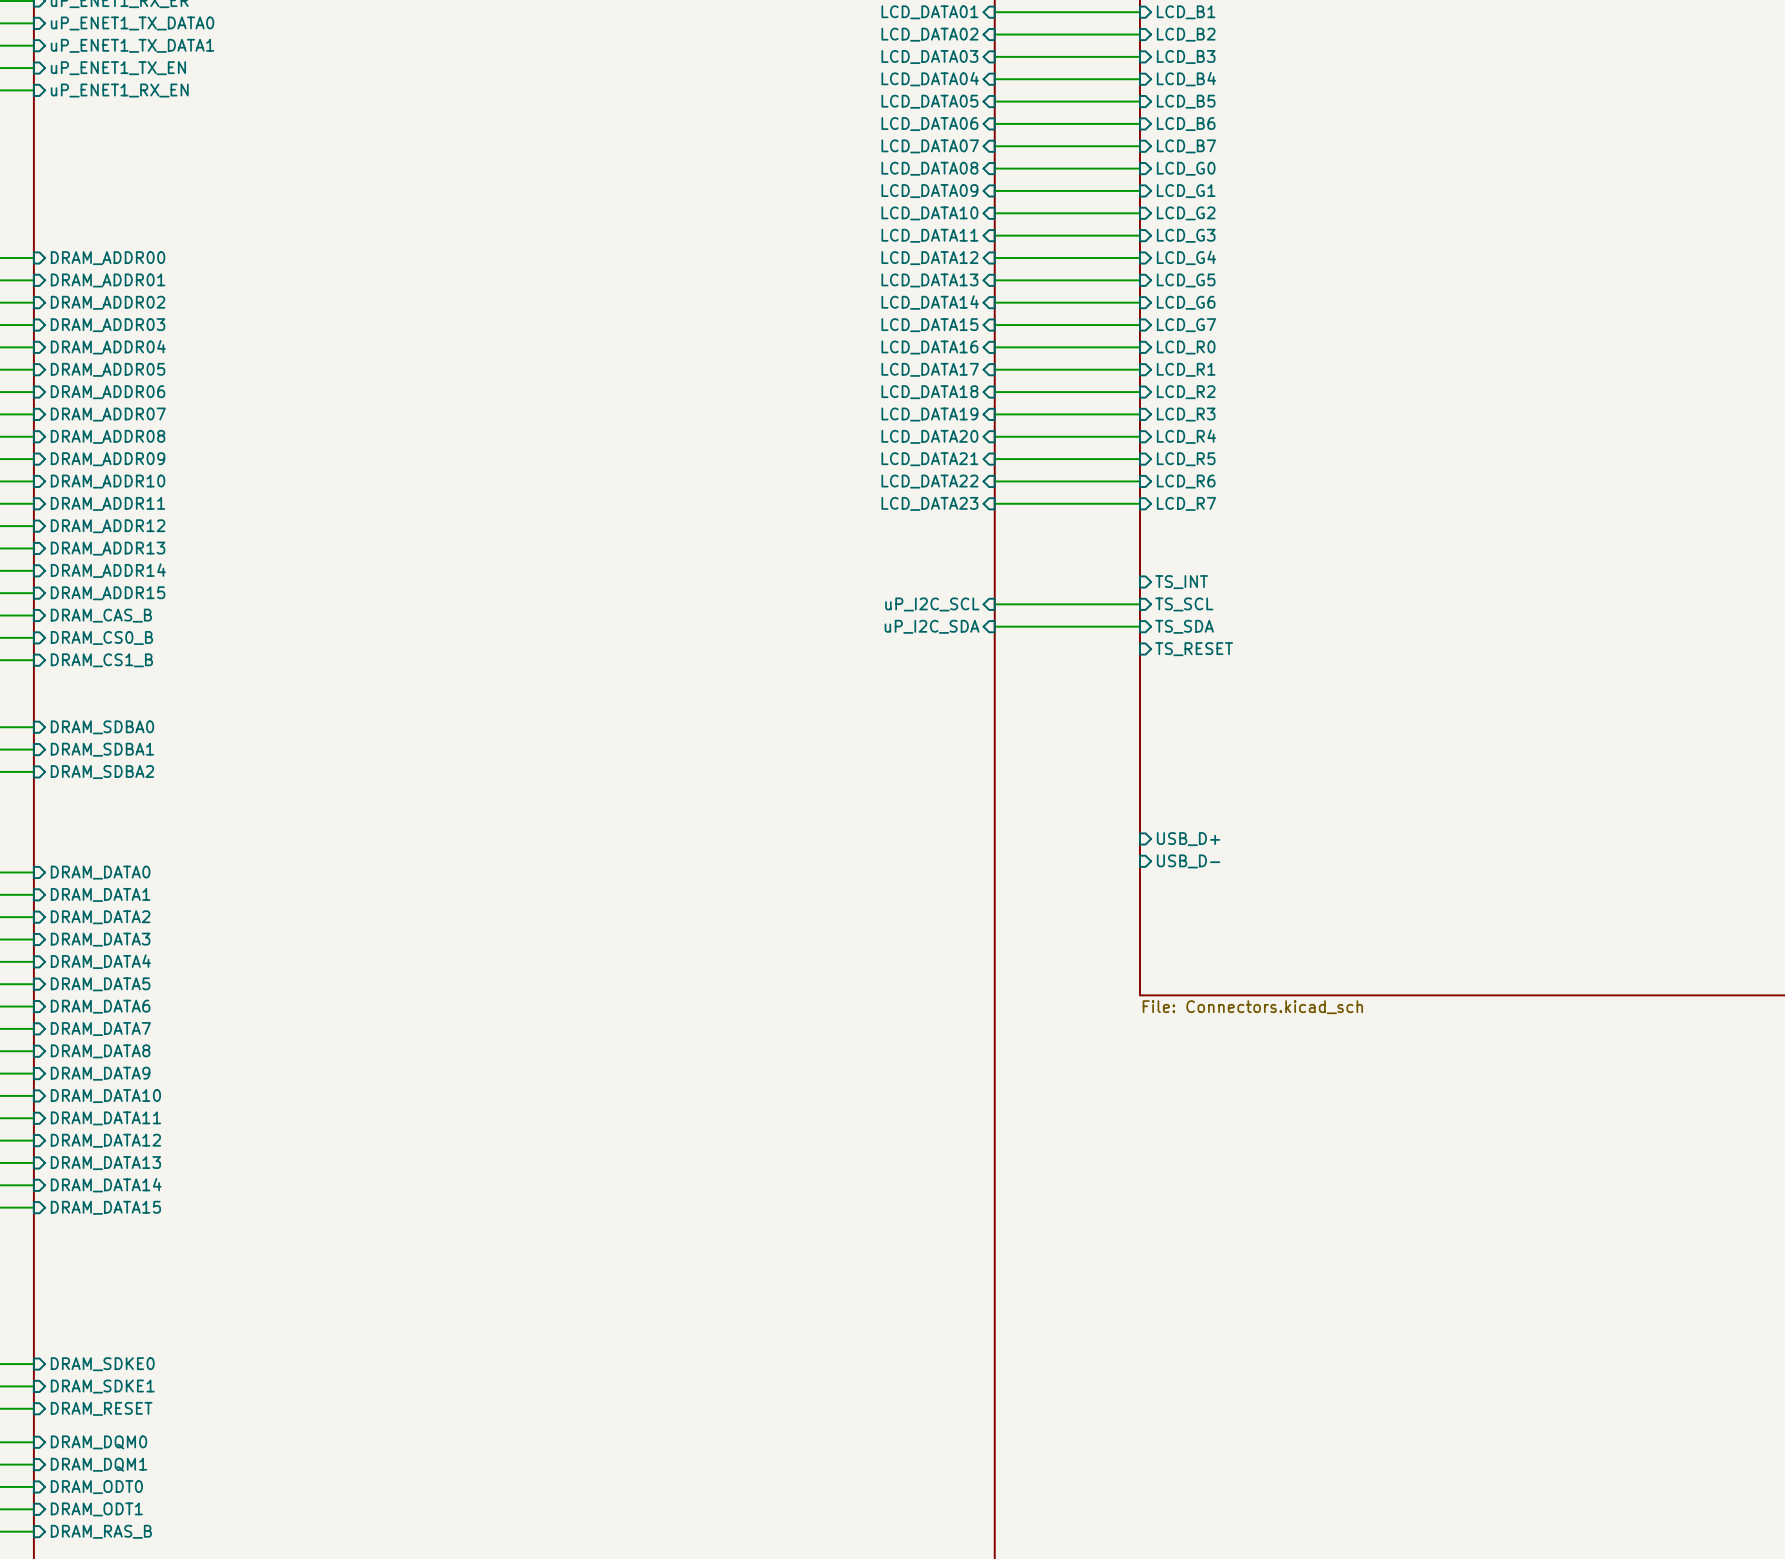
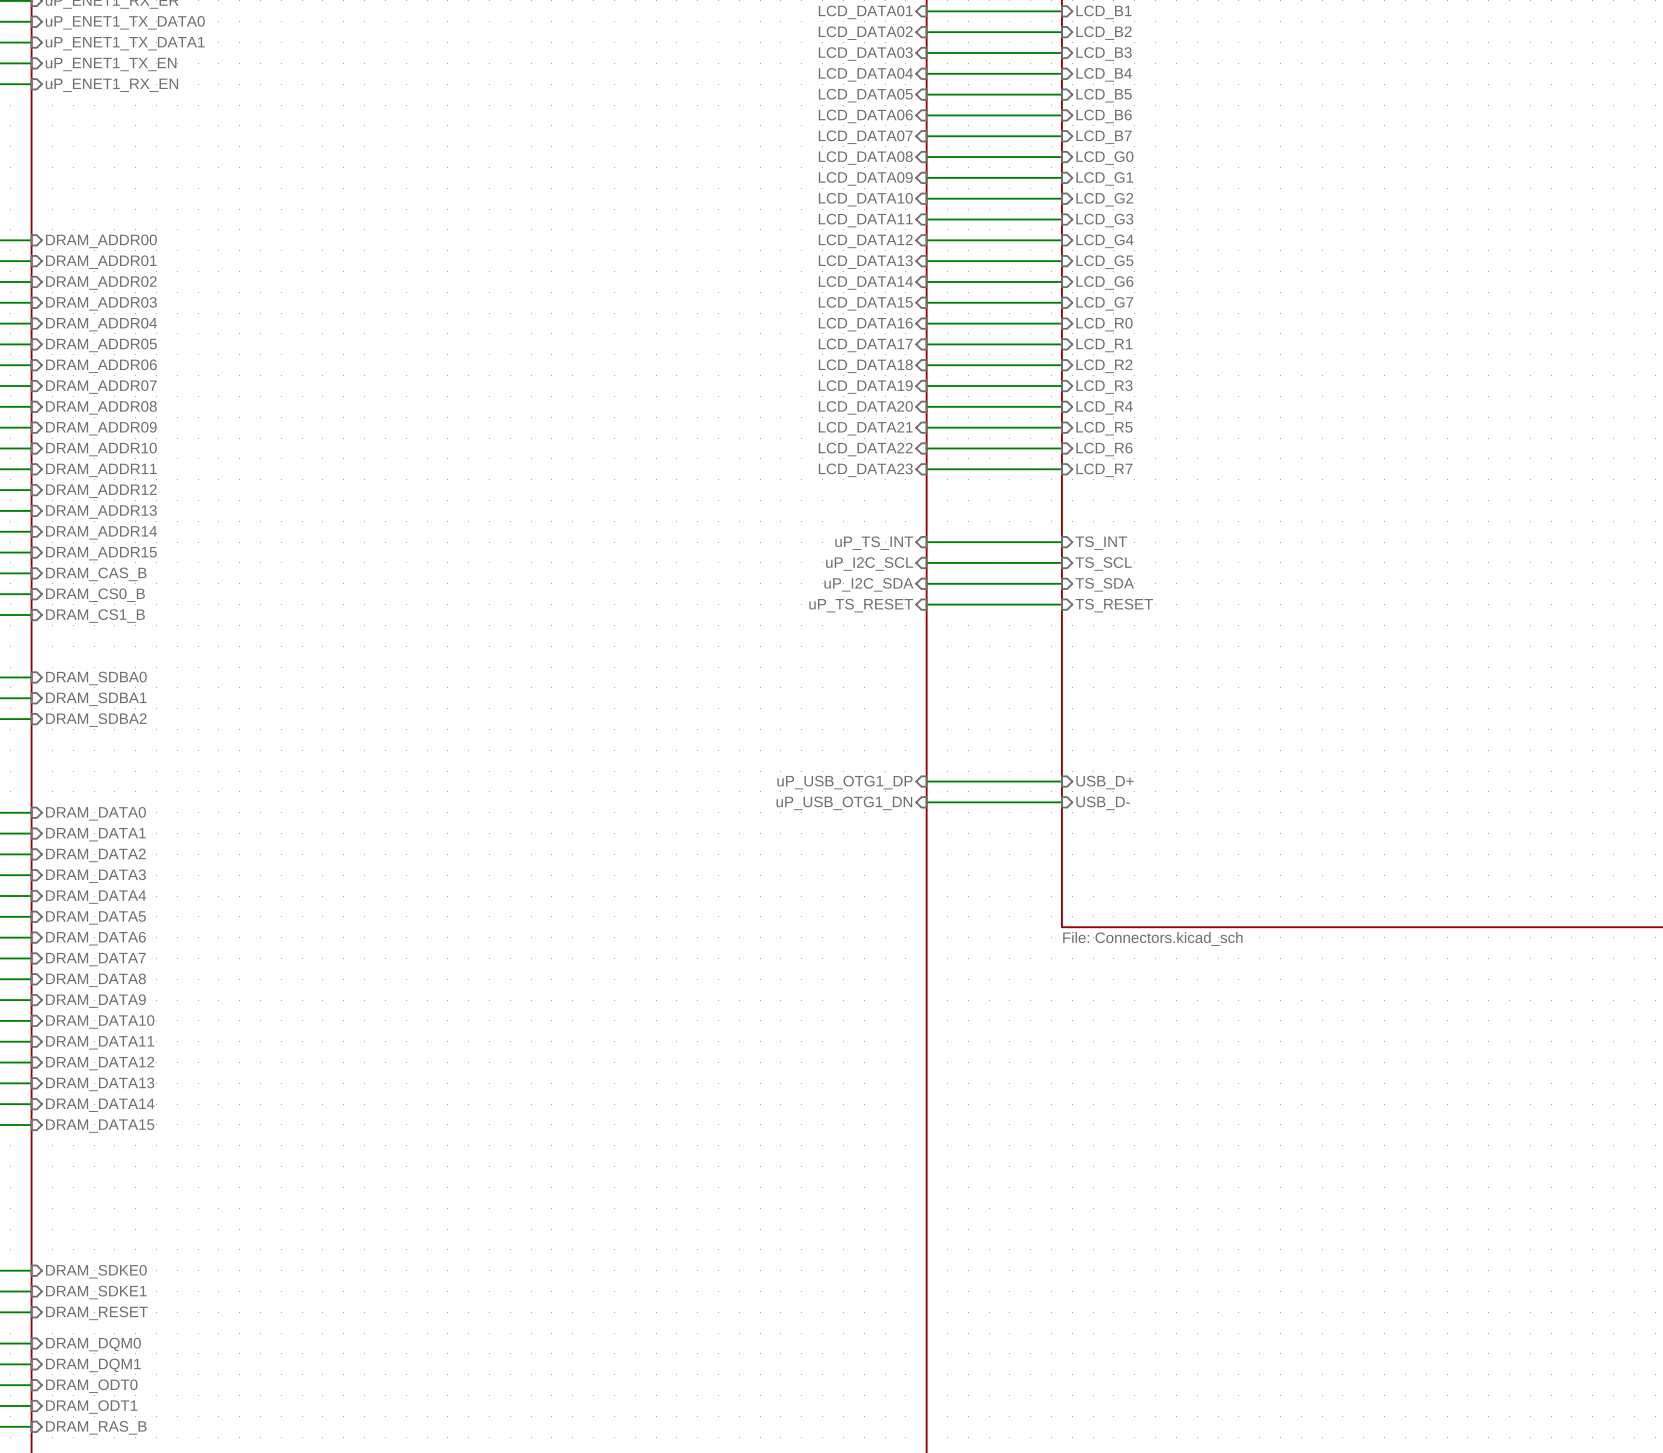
wire: none -> (926, 542) (1061, 542)
sheet pin: none -> uP_TS_INT (874, 543)
sheet pin: none -> uP_TS_RESET (861, 605)
wire: none -> (926, 604) (1061, 604)
wire: none -> (926, 781) (1061, 781)
sheet pin: none -> uP_USB_OTG1_DP (844, 782)
sheet pin: none -> uP_USB_OTG1_DN (844, 803)
wire: none -> (926, 802) (1061, 802)

